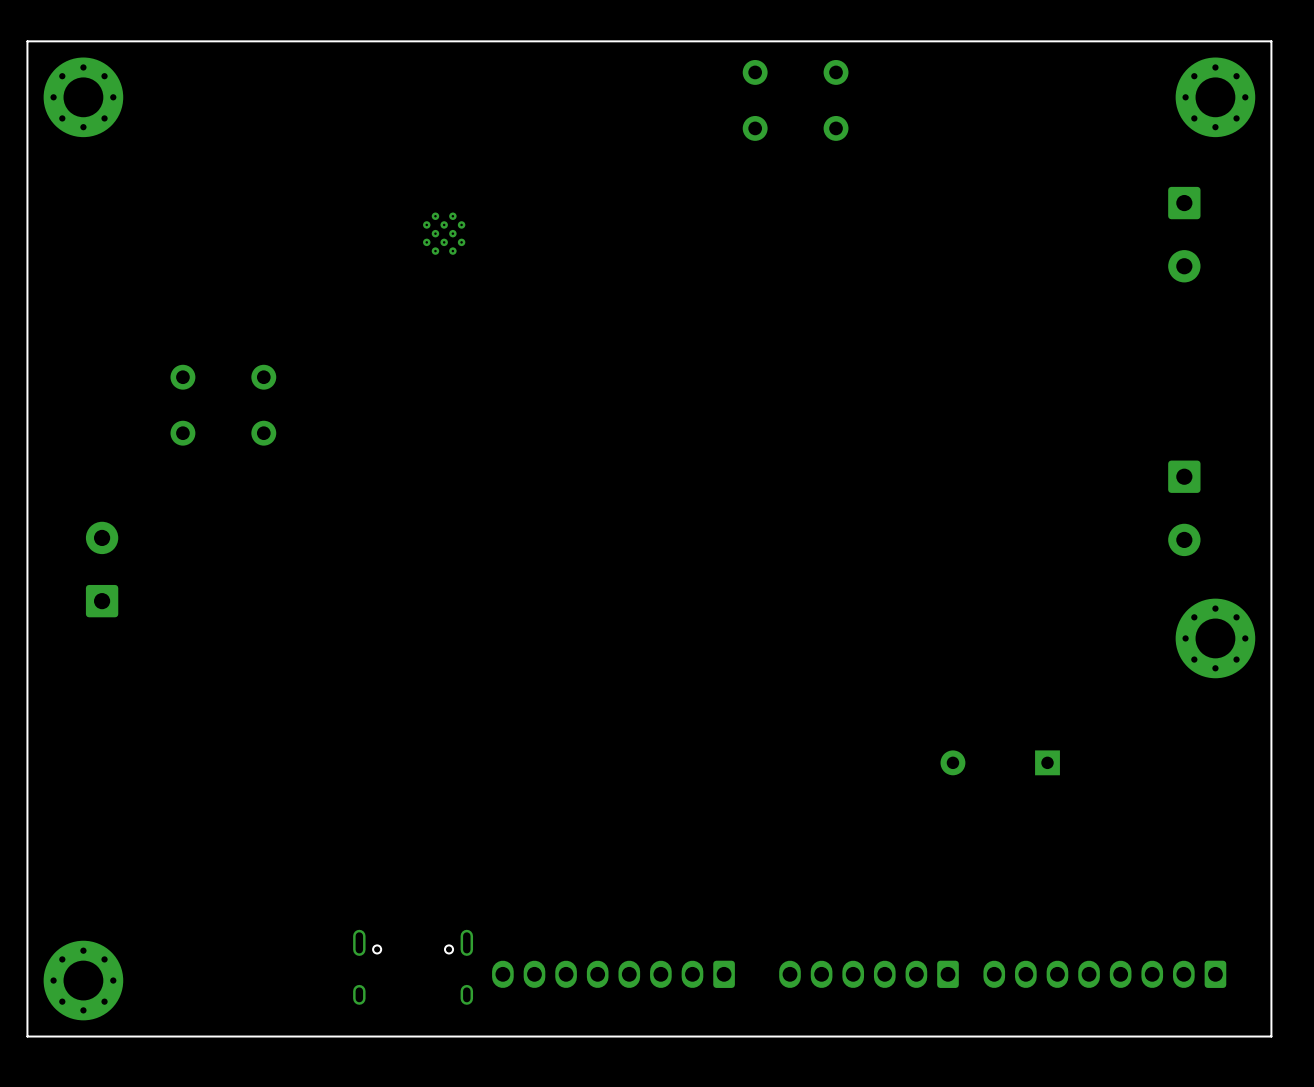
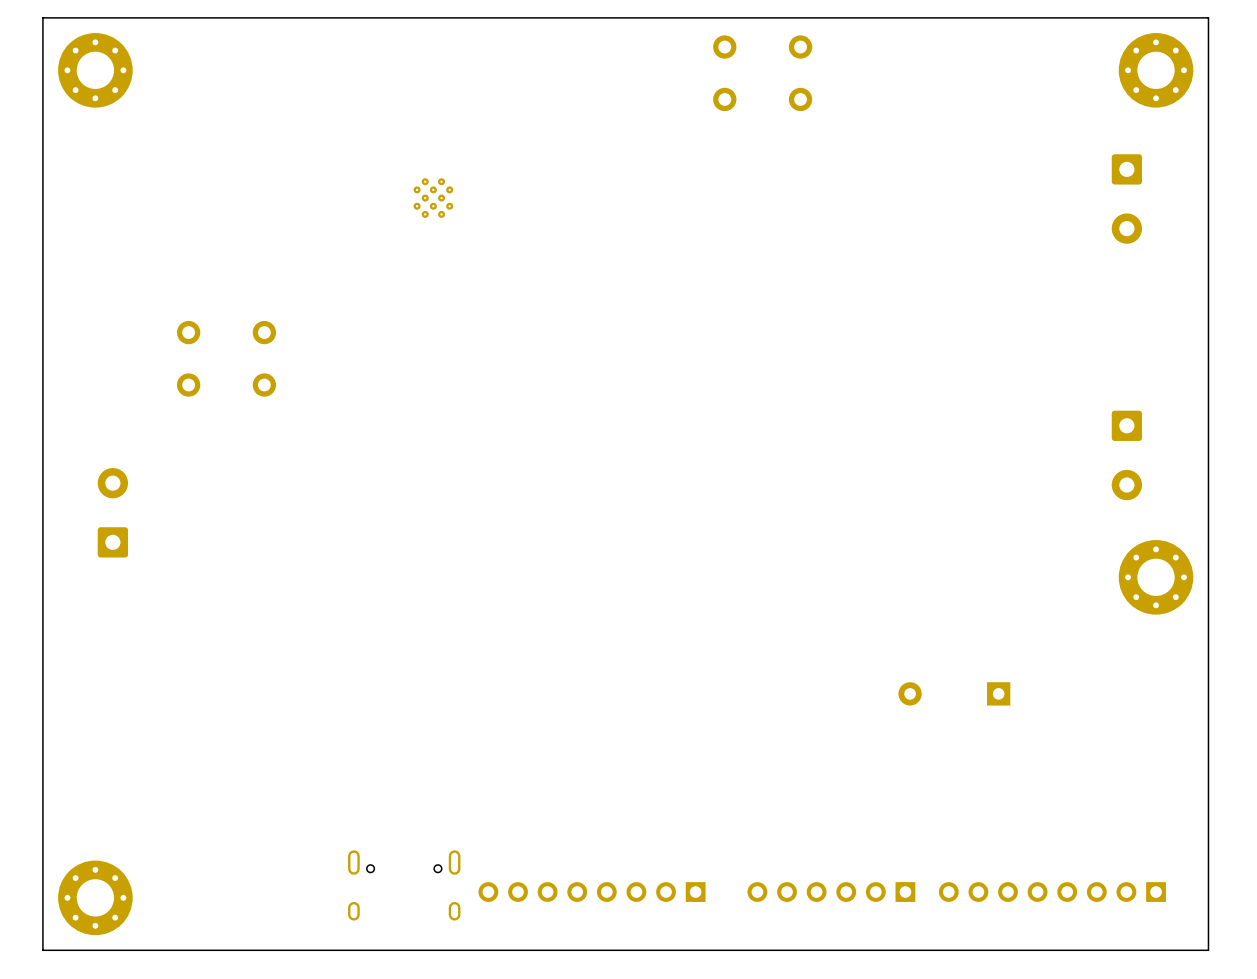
part footprint: [492, 960, 735, 988] -> [478, 882, 706, 902]
part footprint: [779, 960, 959, 988] -> [747, 882, 916, 902]
part footprint: [983, 960, 1227, 988] -> [938, 882, 1166, 902]

